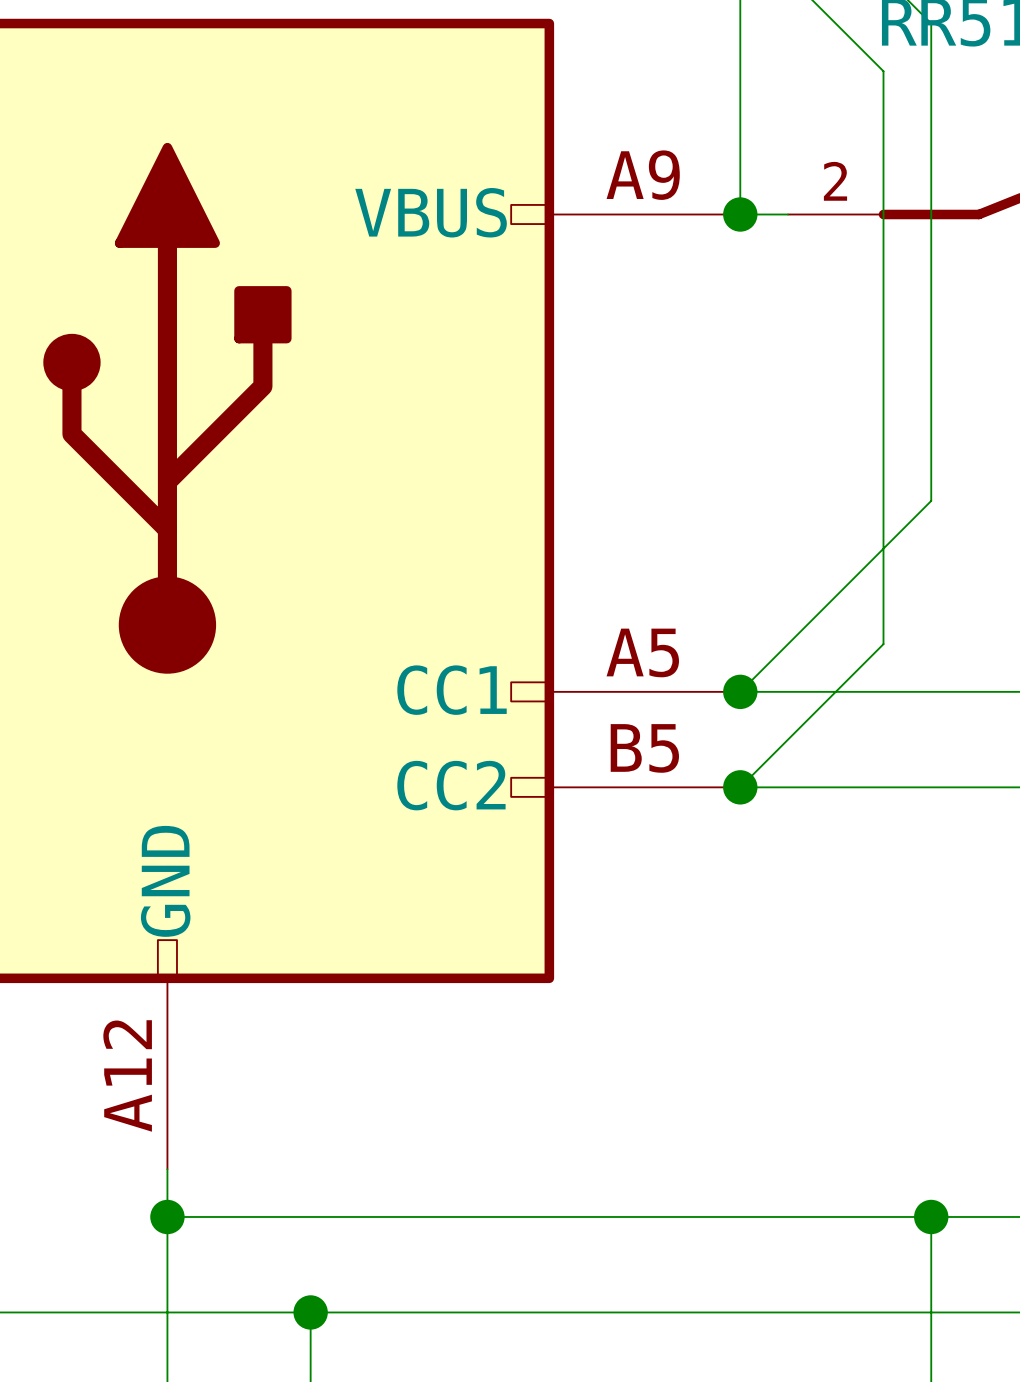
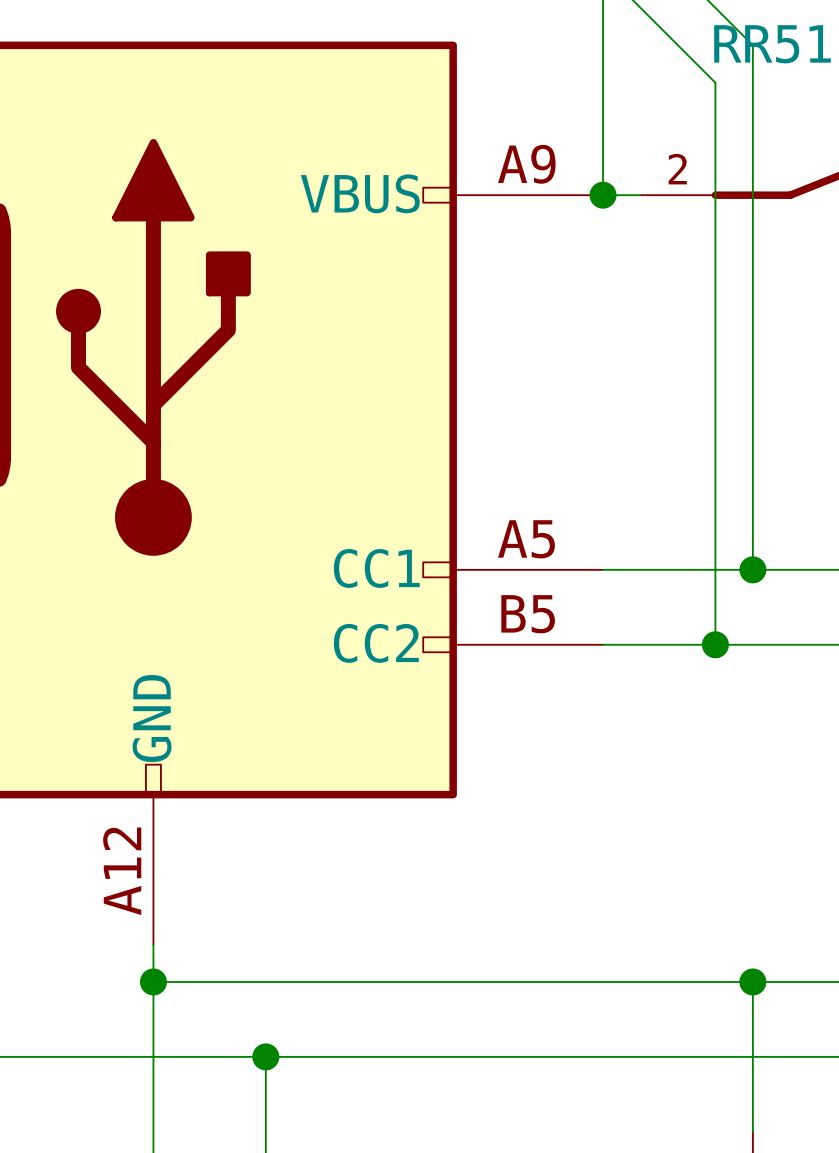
wire: (931, 500) (740, 691) -> (752, 419) (752, 569)
wire: (883, 644) (740, 787) -> (715, 532) (715, 644)
junction: (740, 691) -> none
junction: none -> (752, 569)
junction: (740, 787) -> none
junction: none -> (715, 644)

